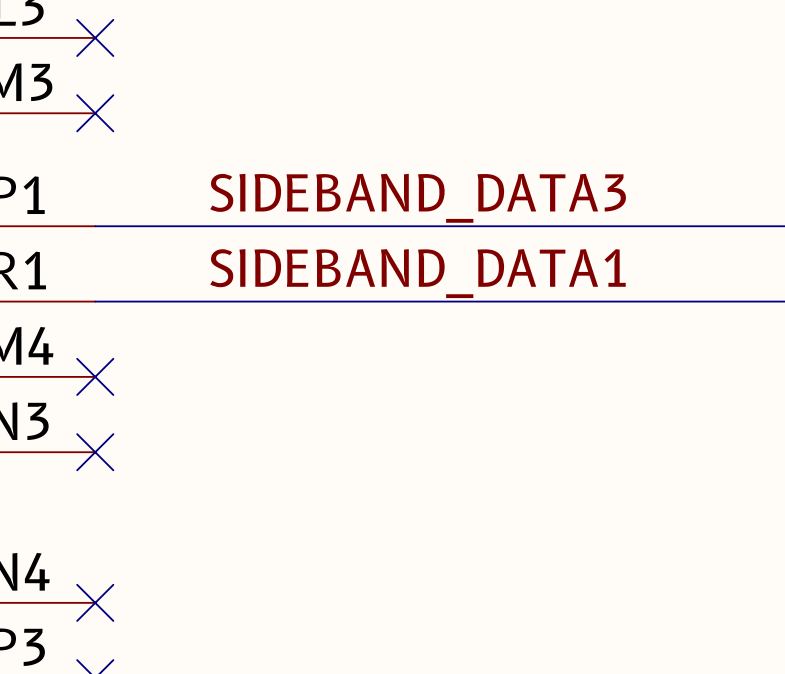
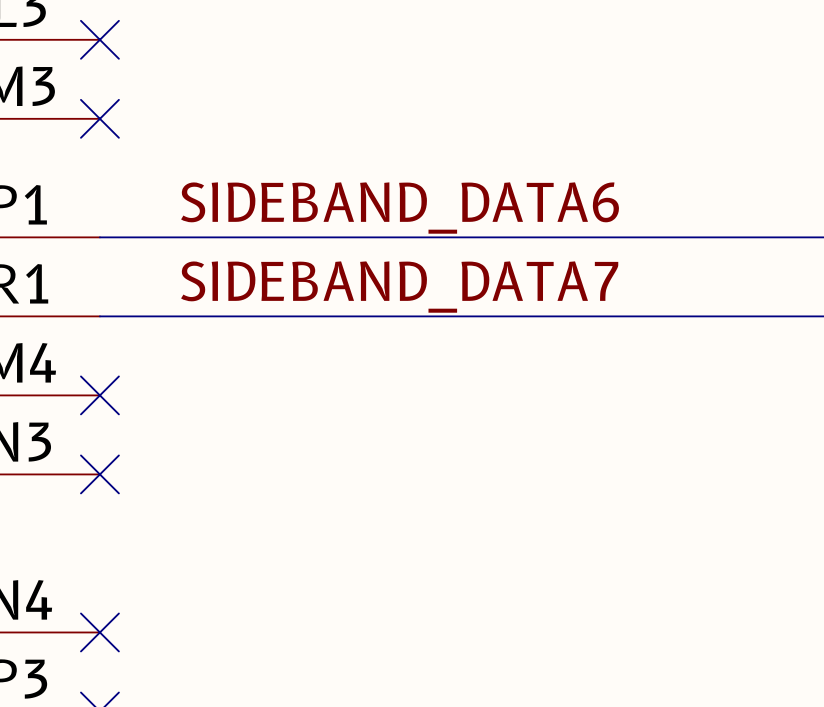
label: SIDEBAND_DATA3 (418, 198) -> SIDEBAND_DATA6 (400, 208)
label: SIDEBAND_DATA1 (418, 273) -> SIDEBAND_DATA7 (399, 287)

